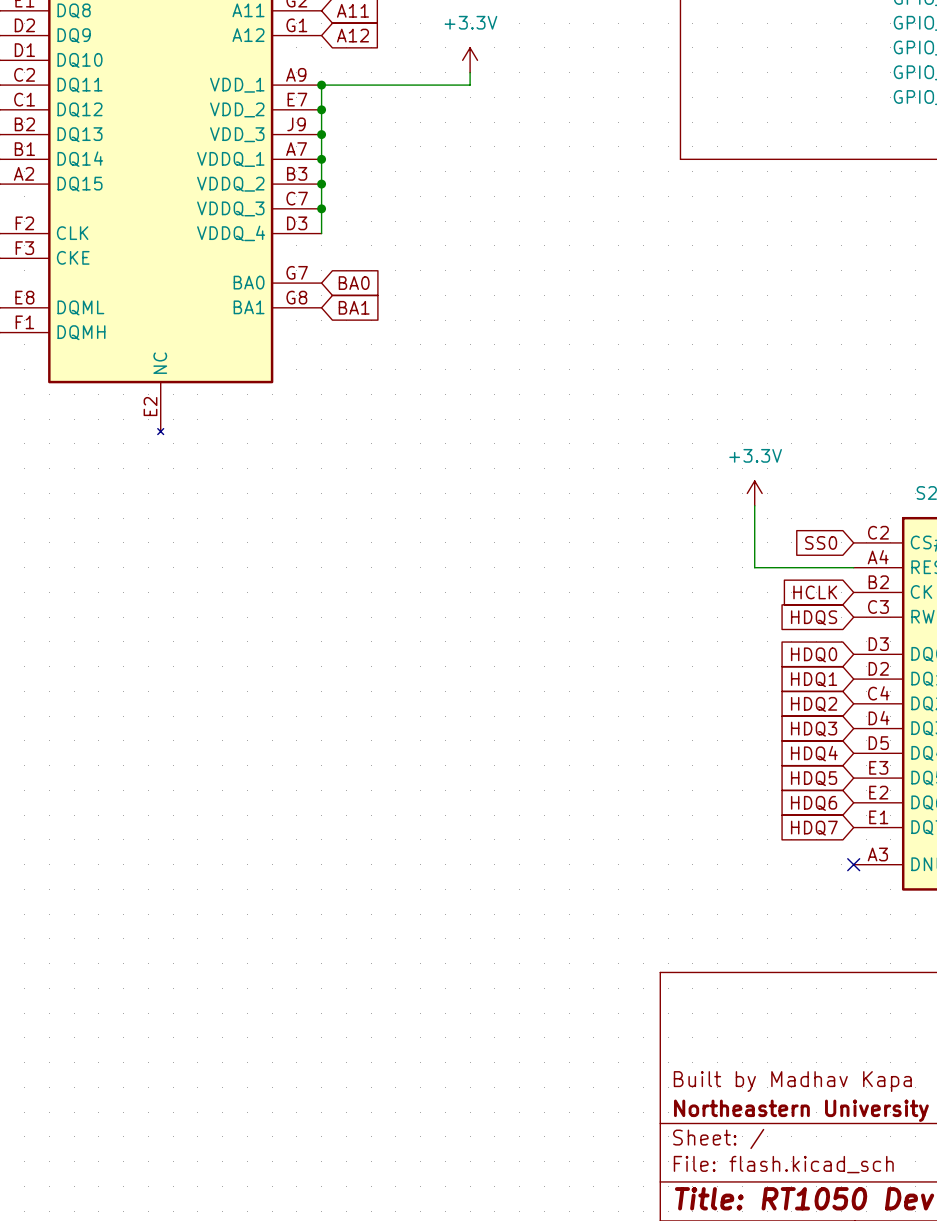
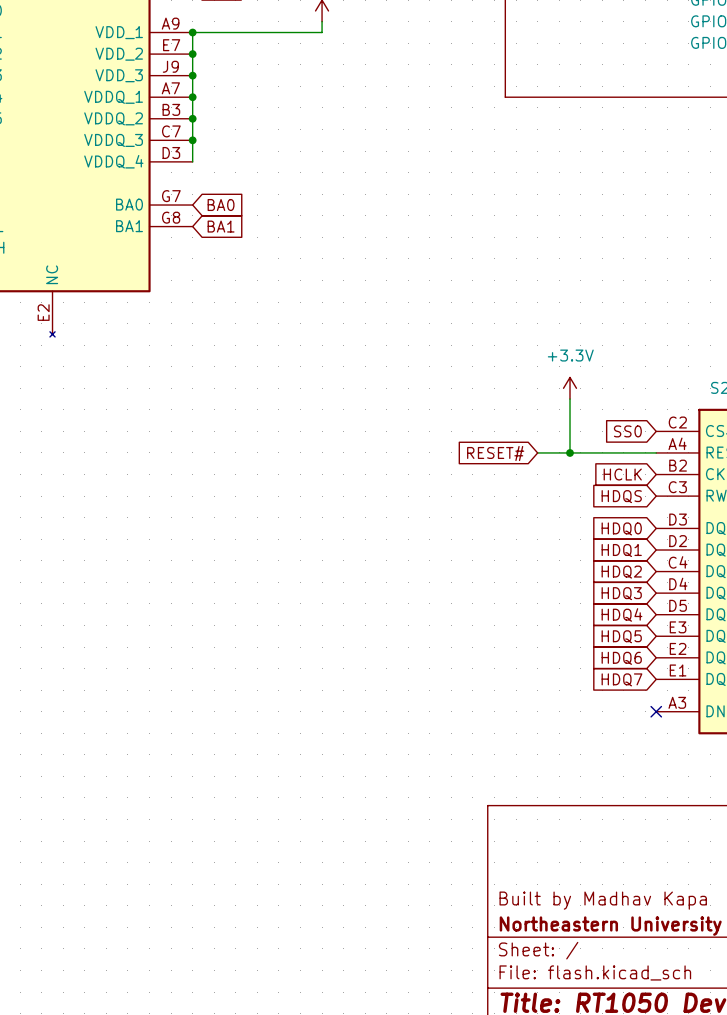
wire: none -> (537, 452) (570, 452)
junction: none -> (570, 452)
global label: none -> RESET# (495, 453)

